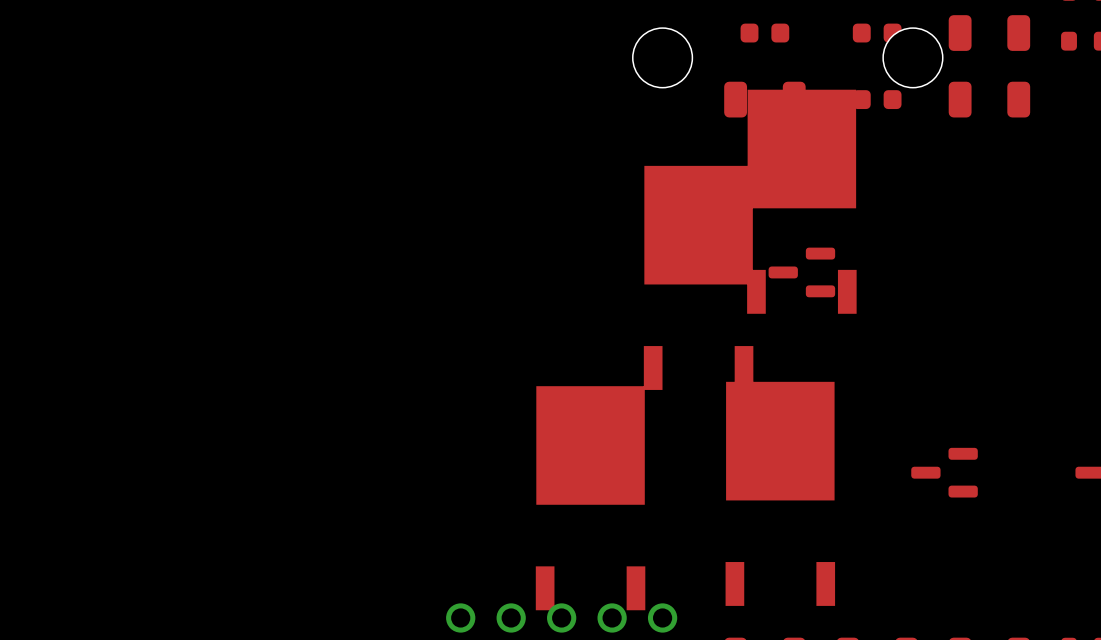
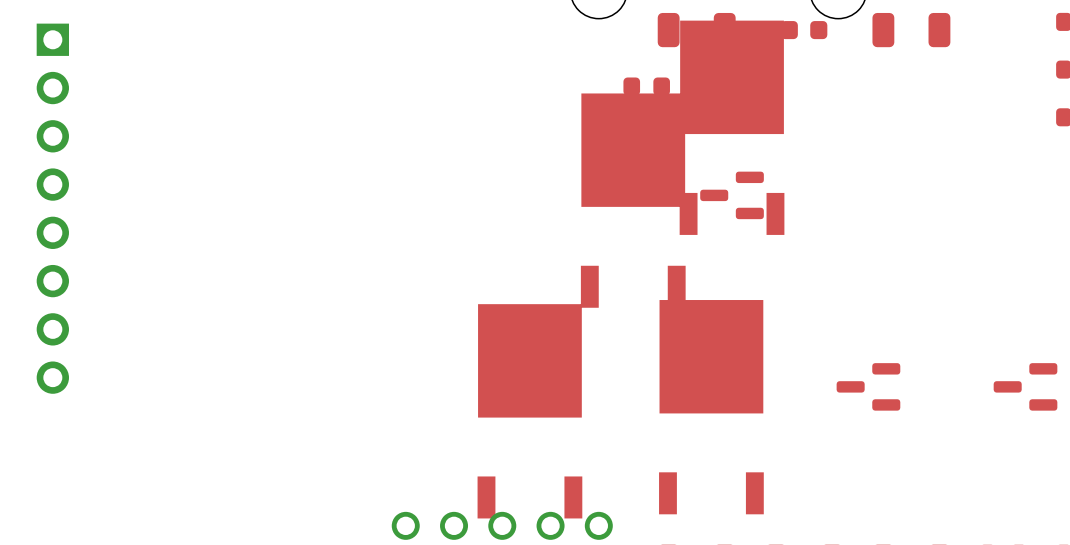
part: none -> (646, 86)
part: none -> (52, 208)

